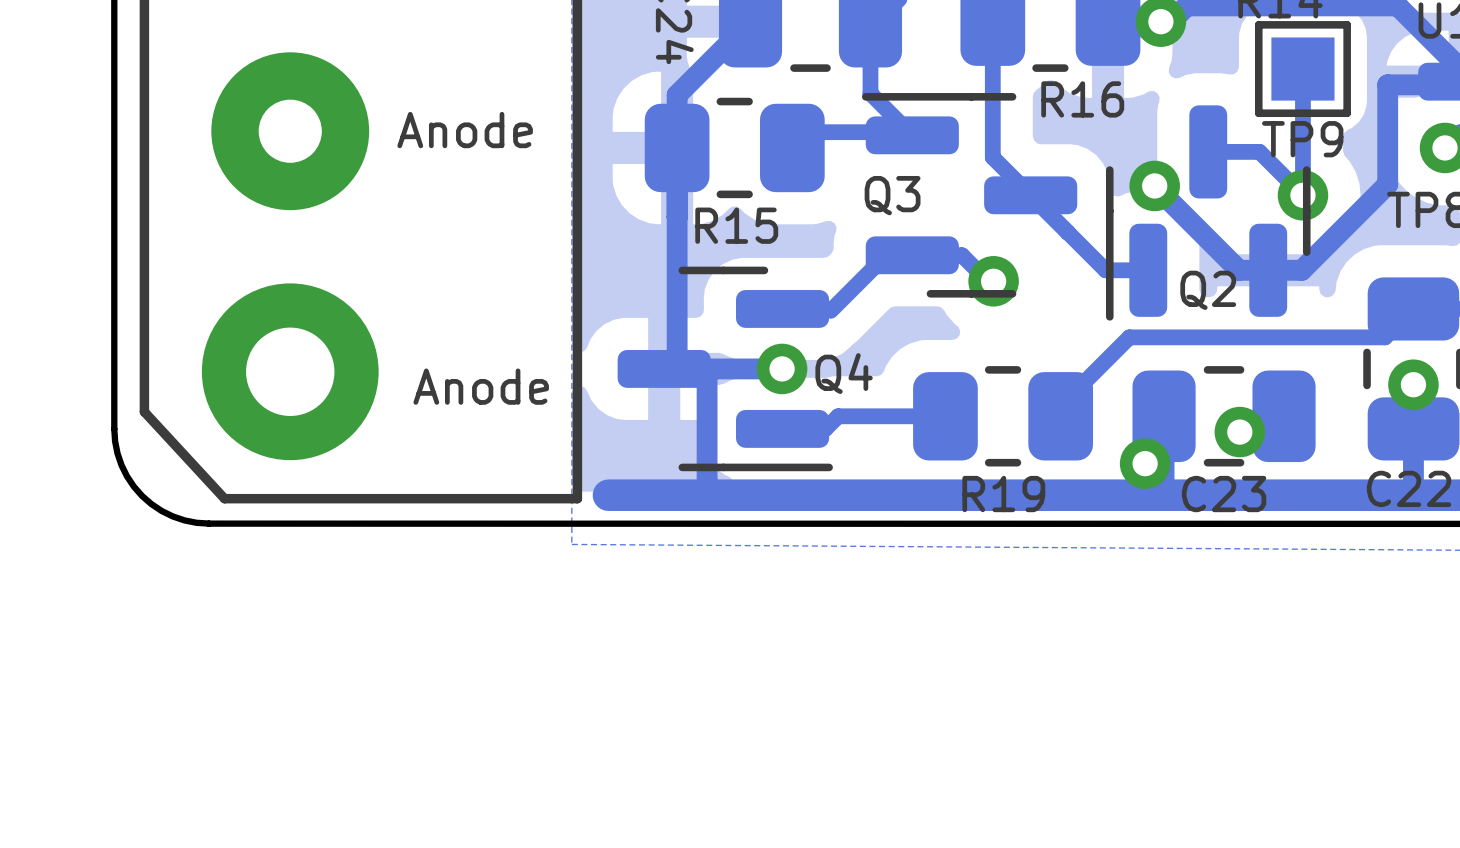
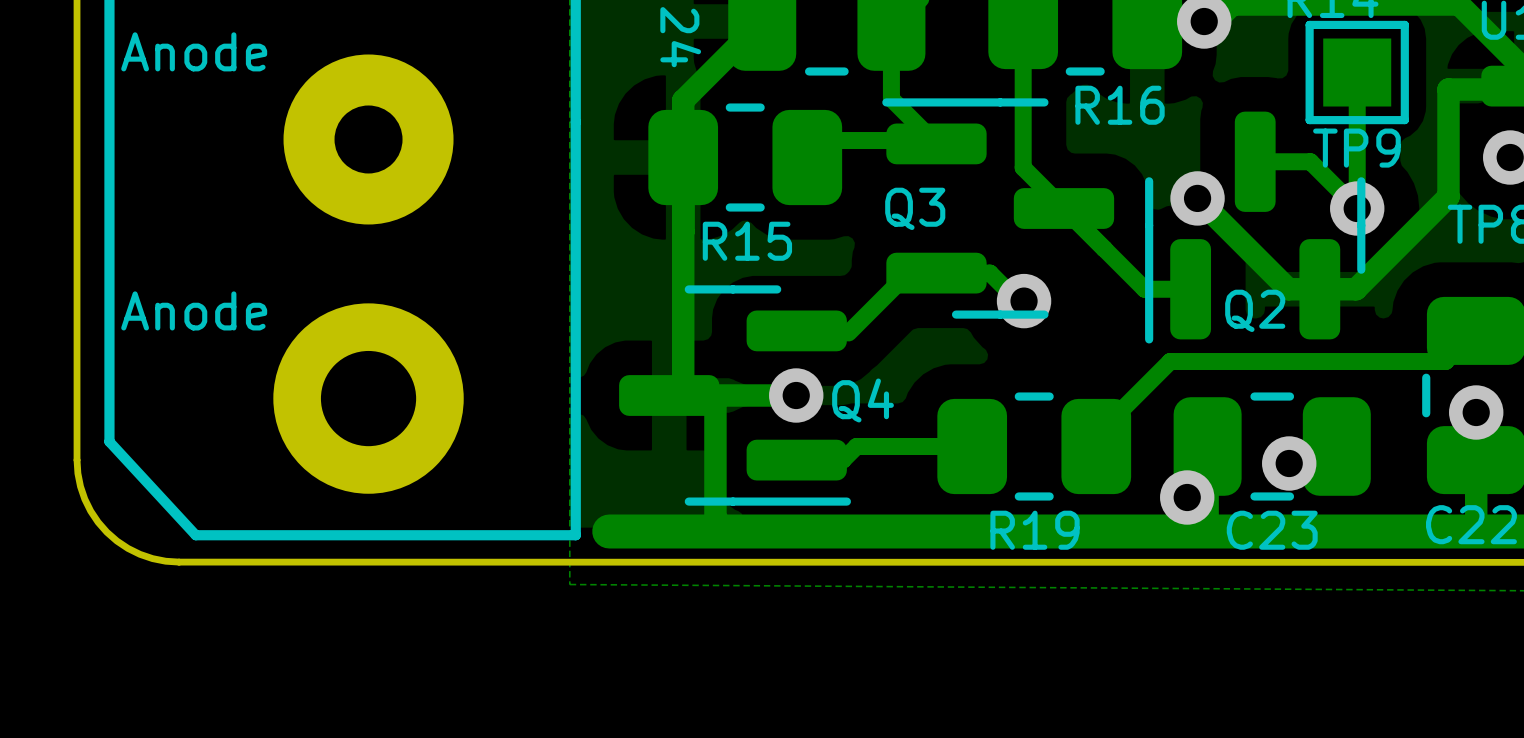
part value position: Anode (465, 130) -> Anode (194, 51)
part position: (290, 131) -> (368, 139)
part position: (290, 371) -> (368, 398)
part value position: Anode (481, 386) -> Anode (194, 310)

